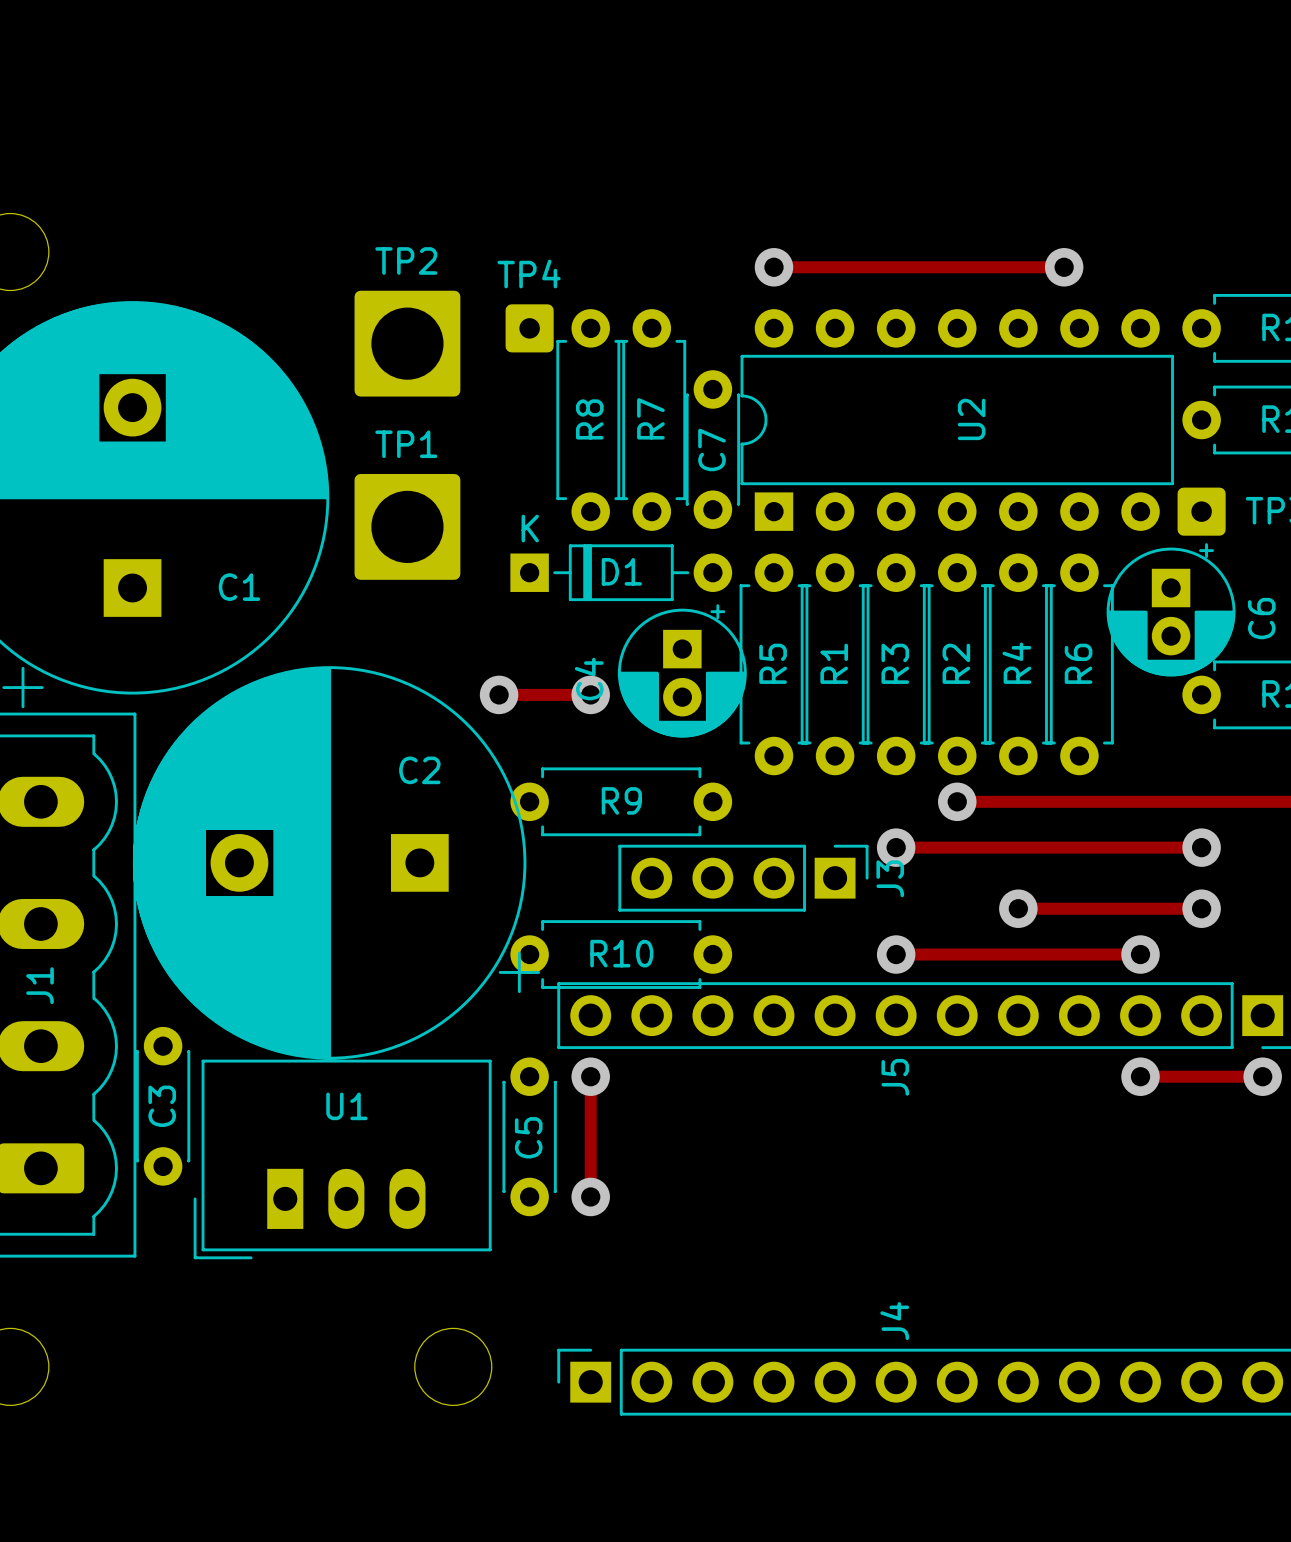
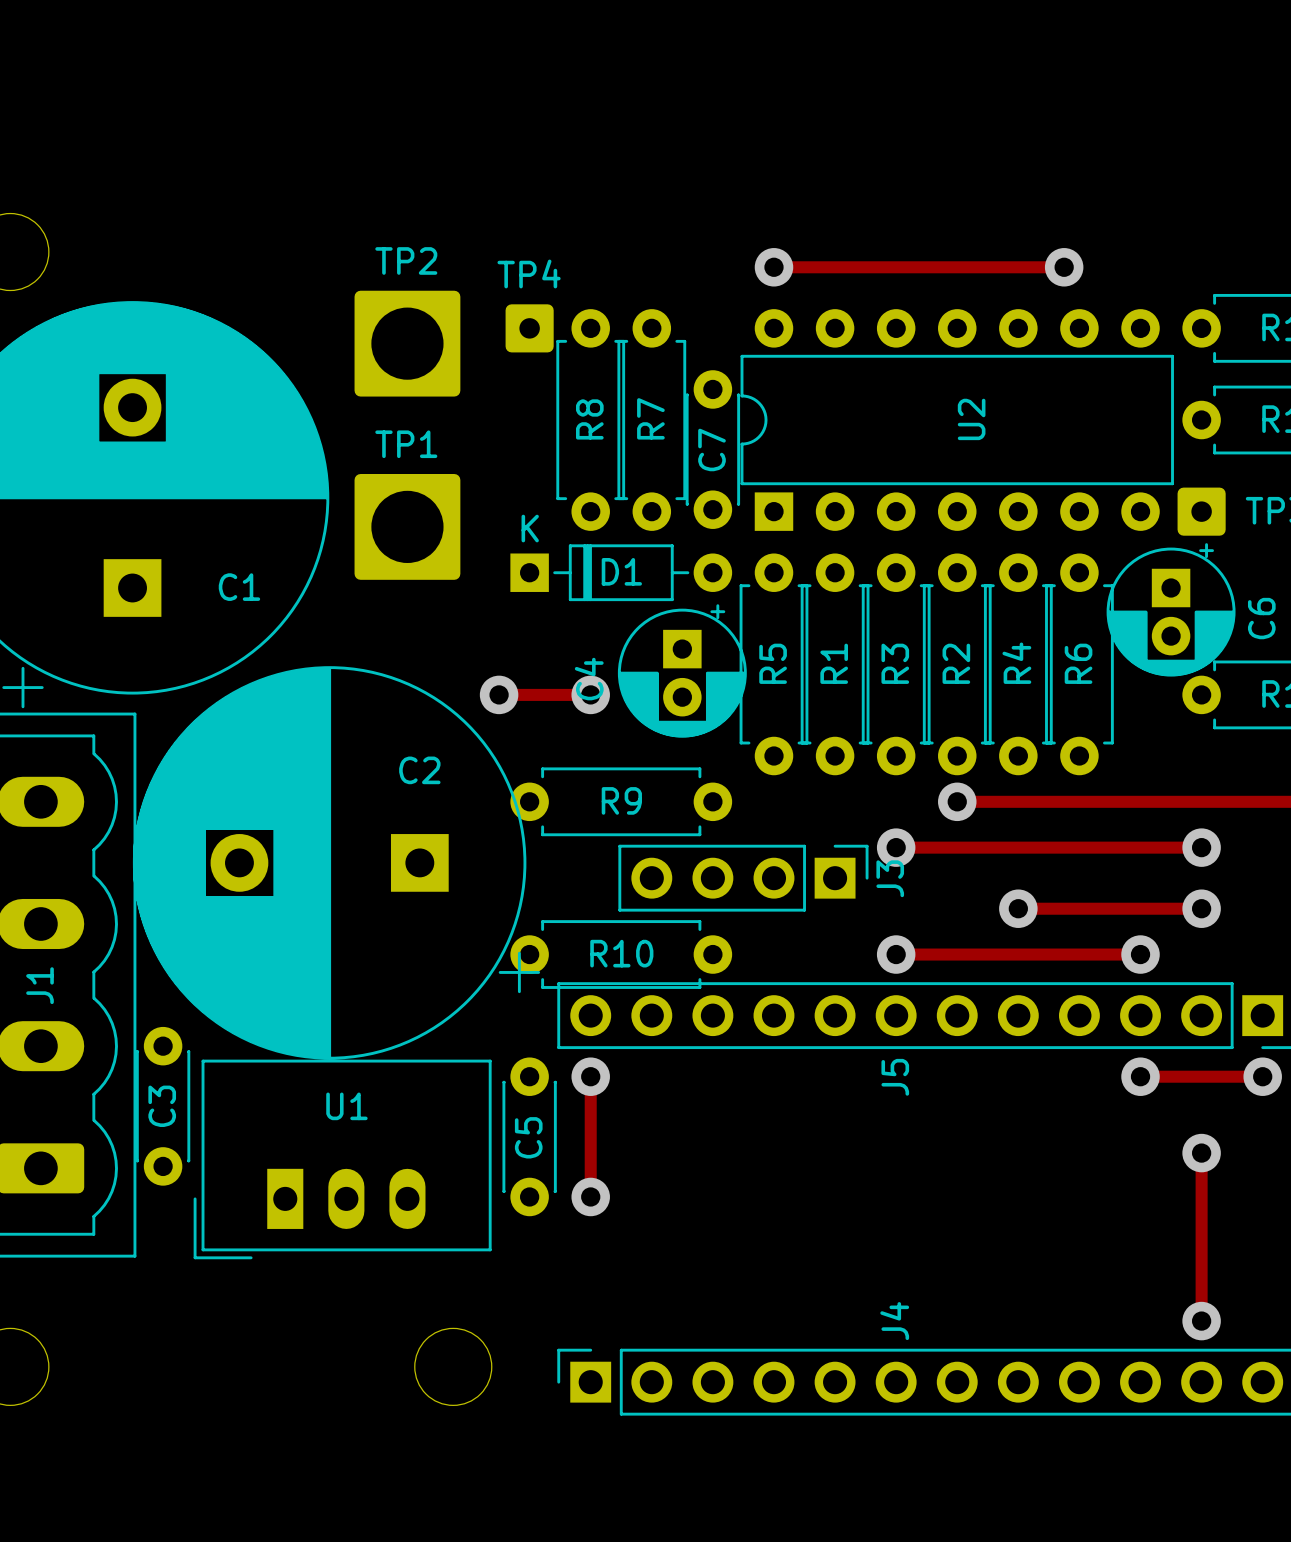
track: none -> (1201, 1153) (1201, 1321)
via: none -> (1201, 1153)
via: none -> (1201, 1321)

